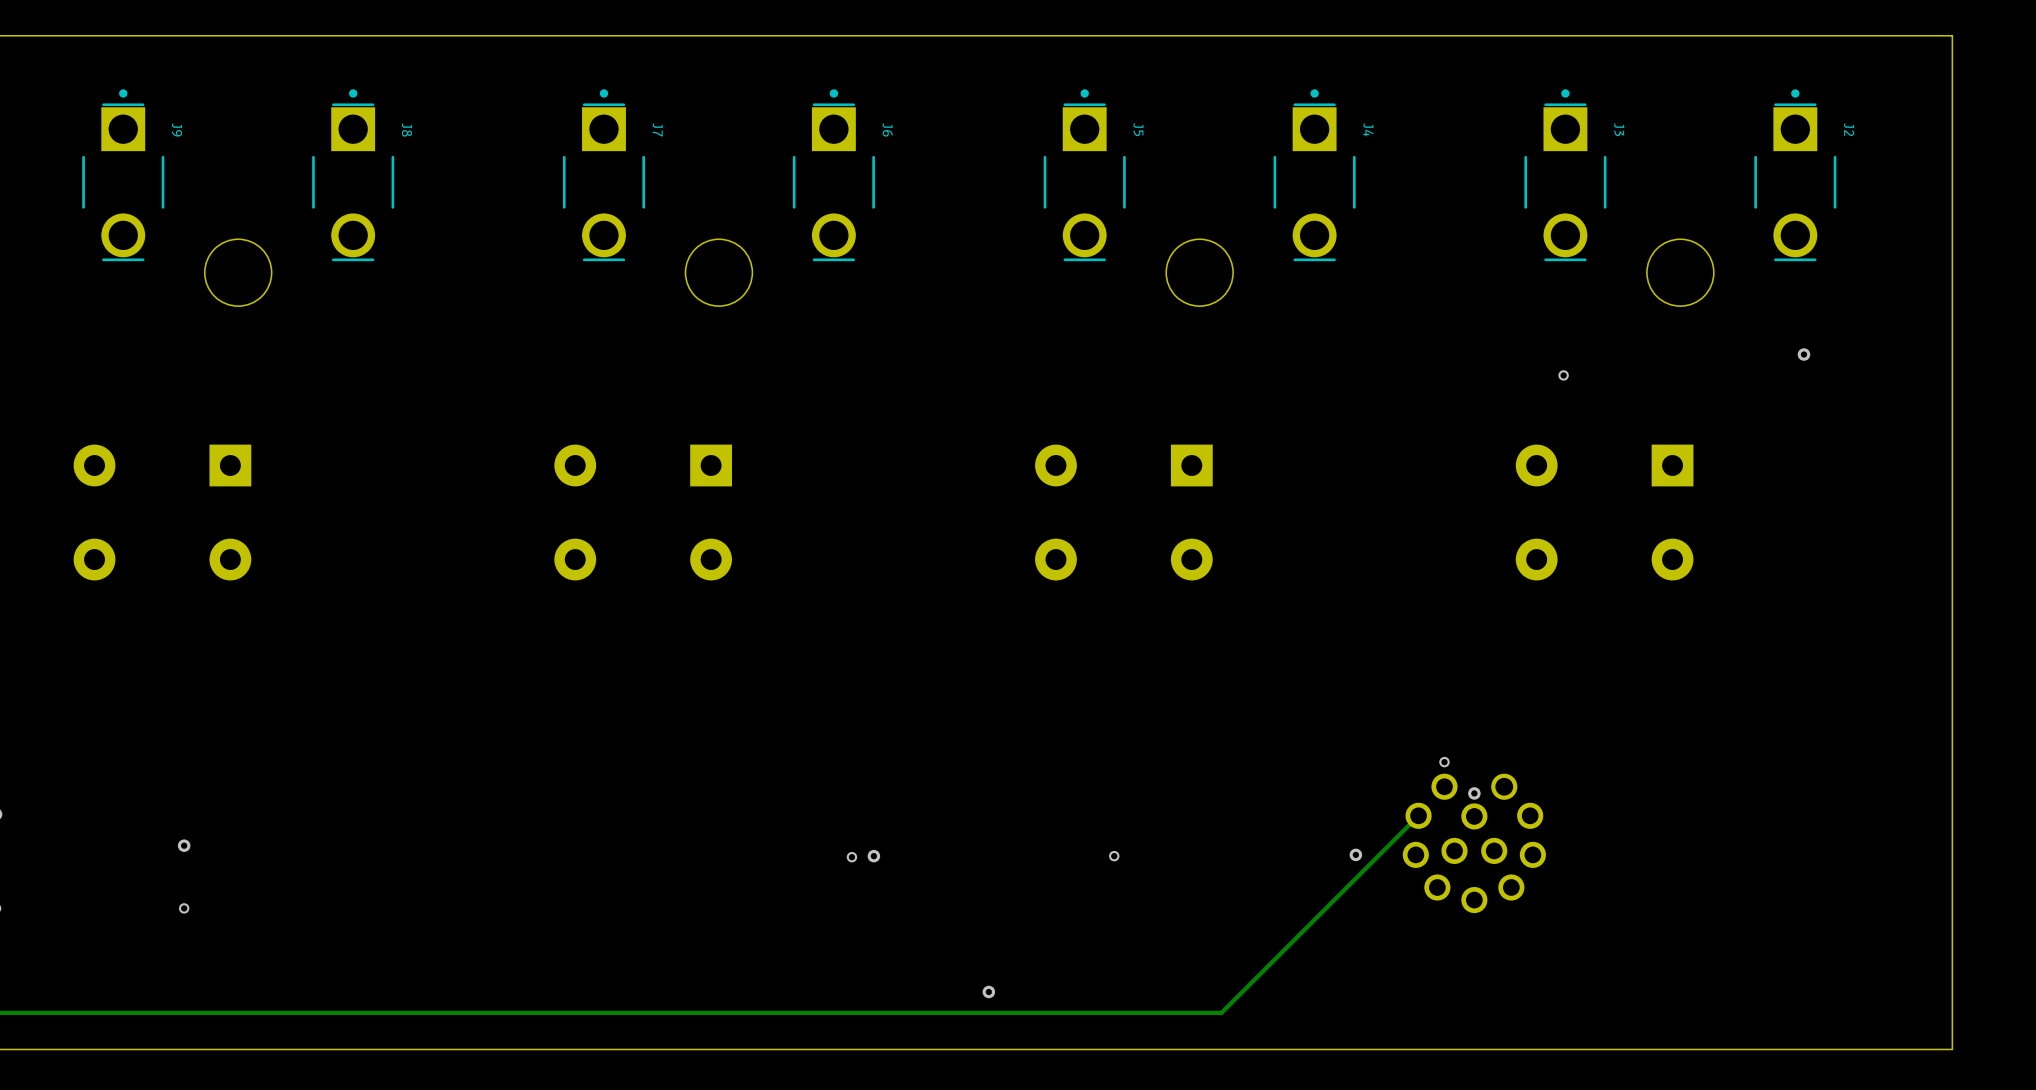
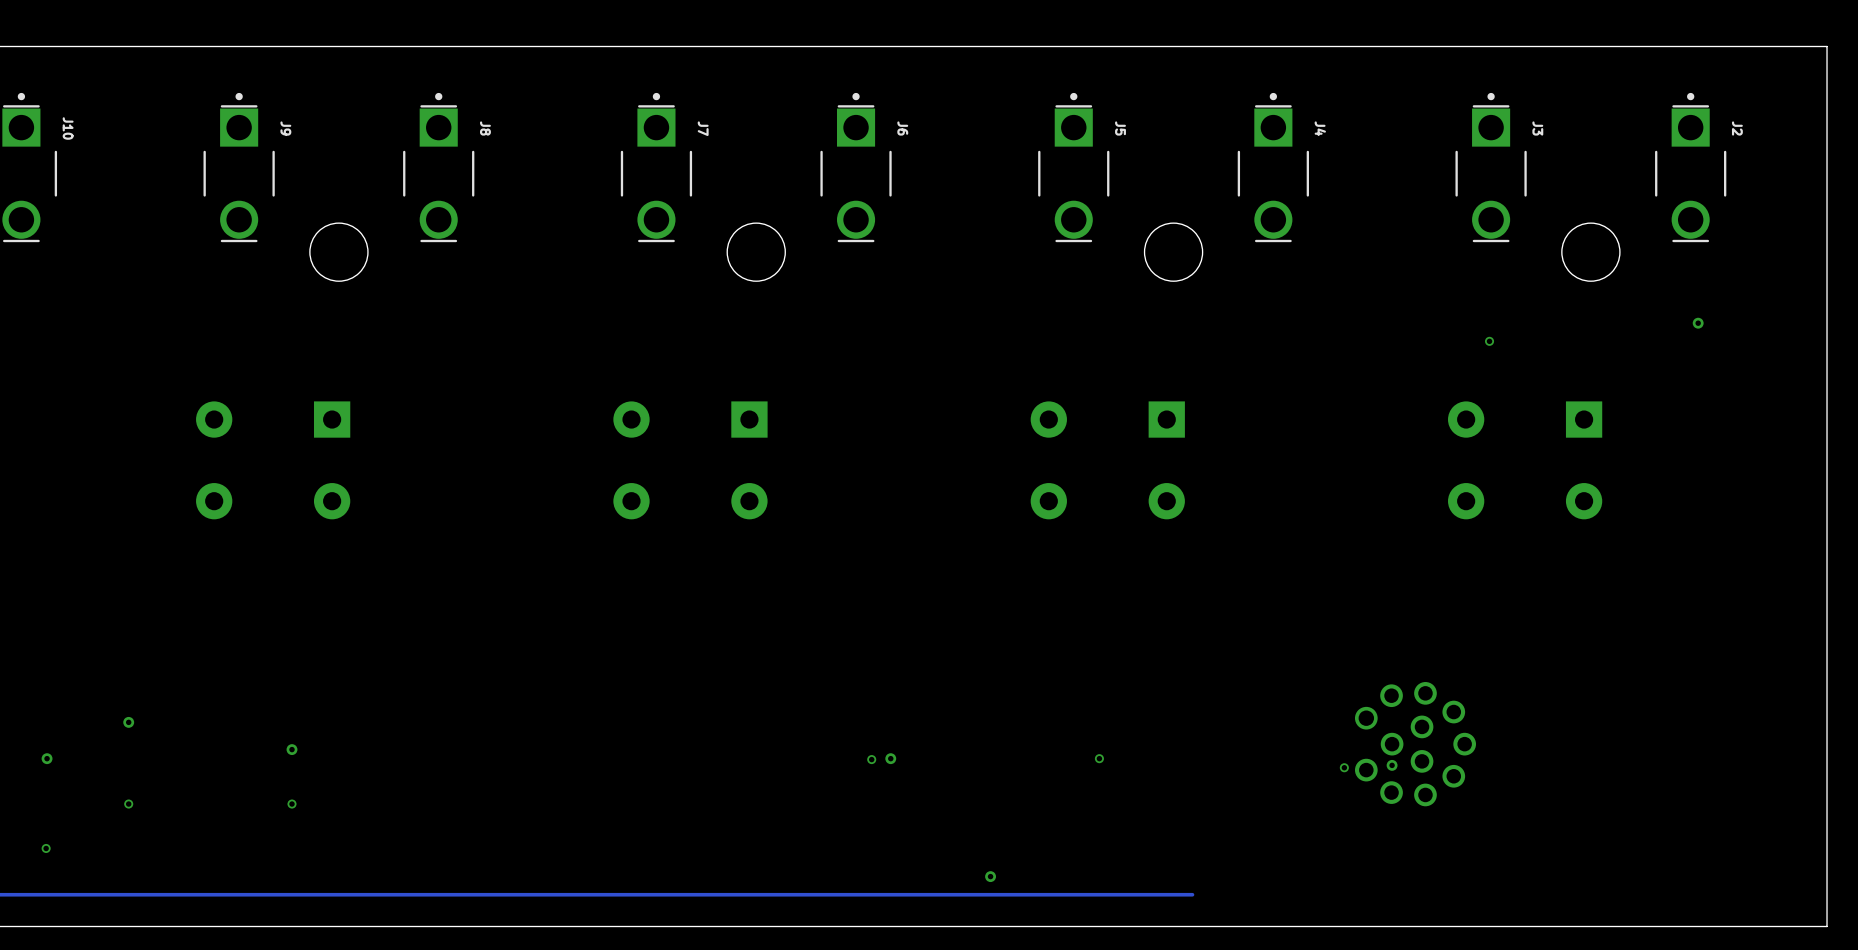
via position: (1444, 762) -> (1344, 767)
via: (1474, 793) -> none
track: (1418, 815) (1221, 1012) -> none
part rotation: 0° (1474, 843) -> 90° counterclockwise (1415, 744)
via: (1355, 854) -> none
via: none -> (1392, 765)

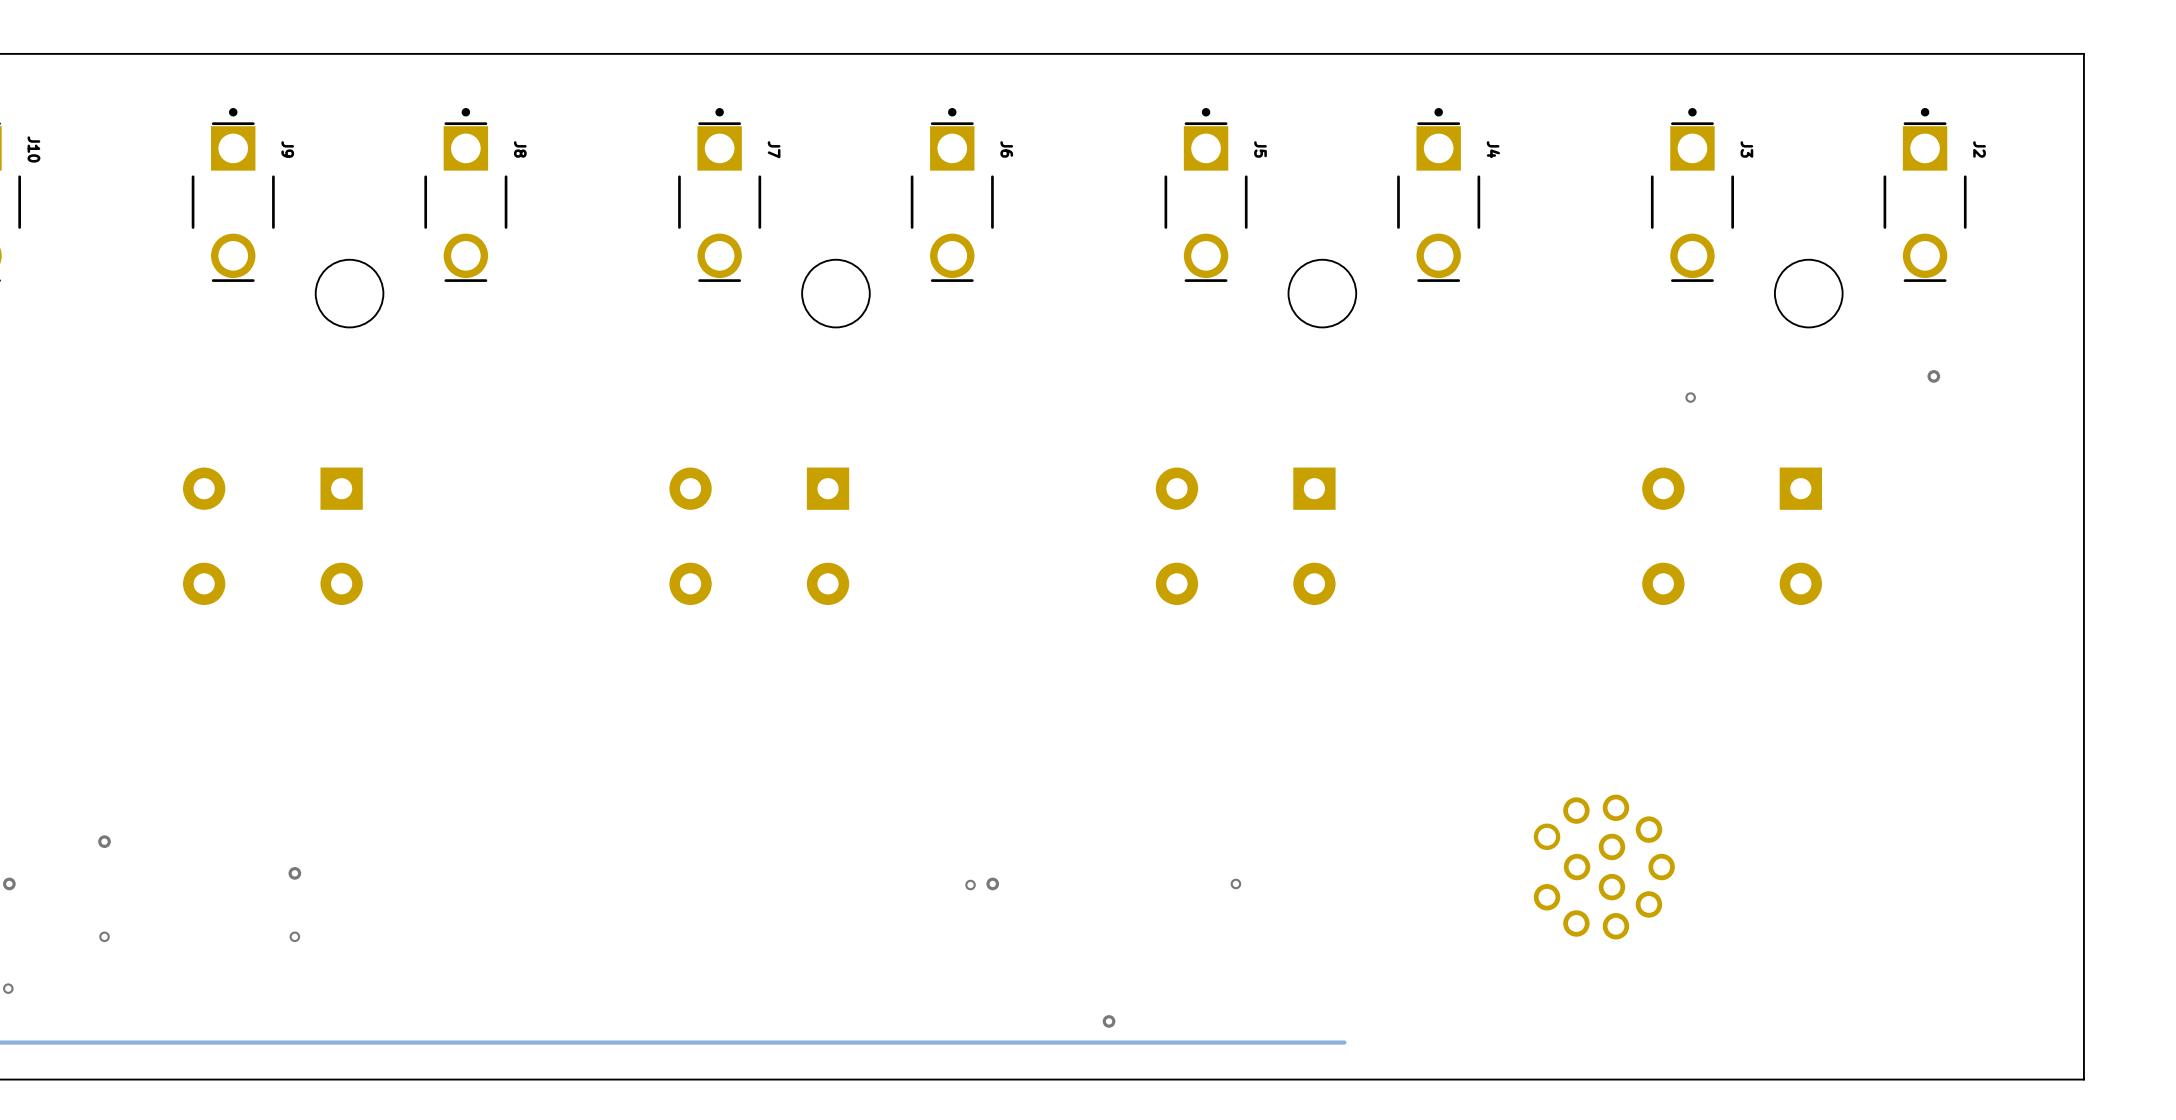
via: (1392, 765) -> none
via: (1344, 767) -> none

